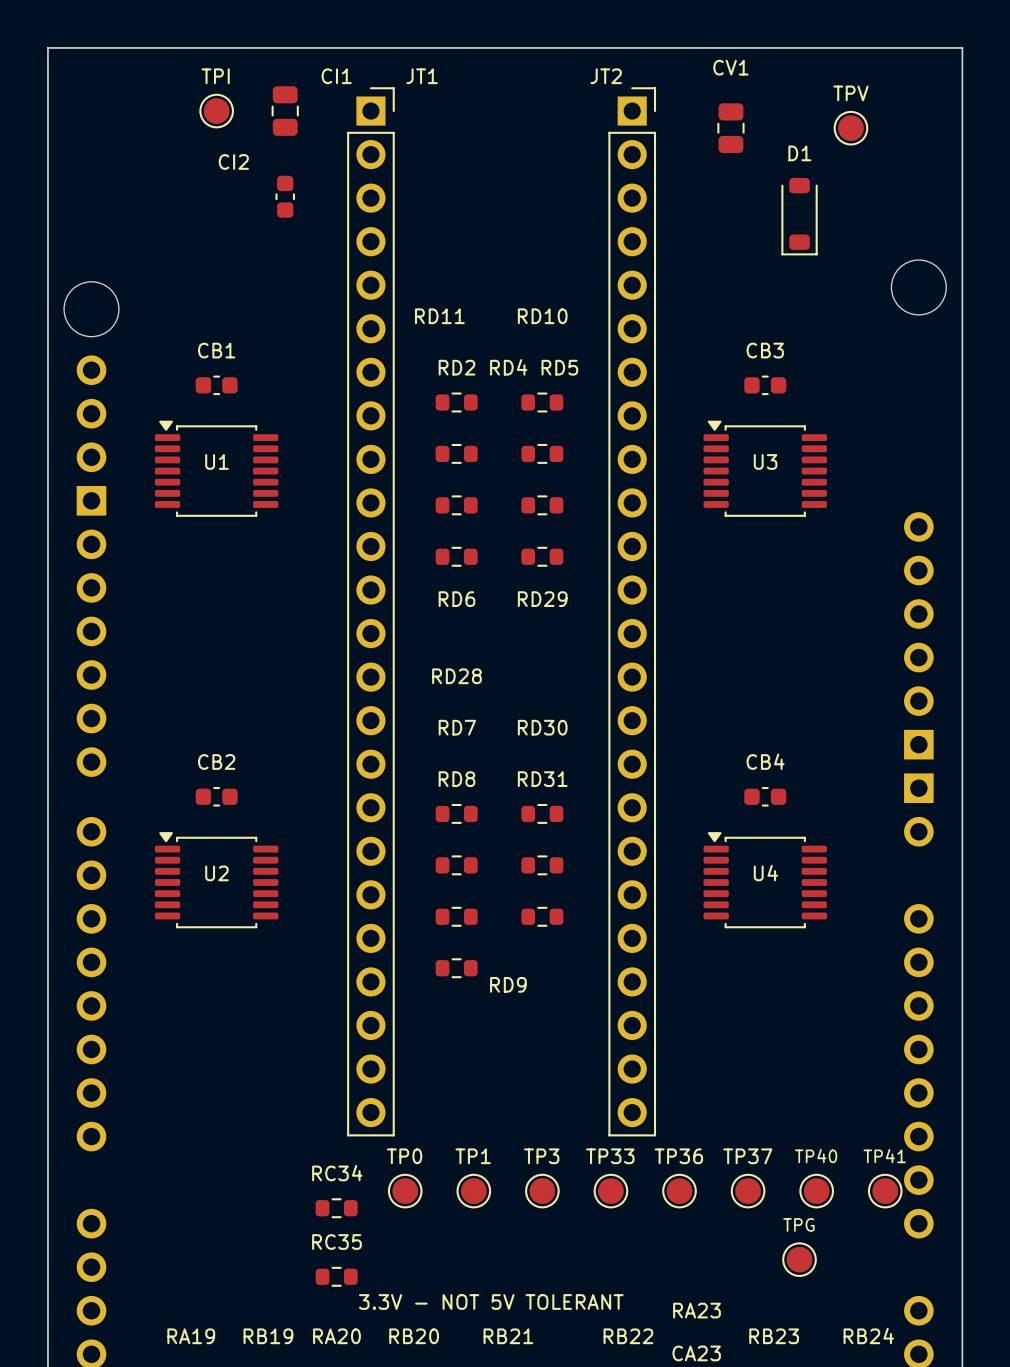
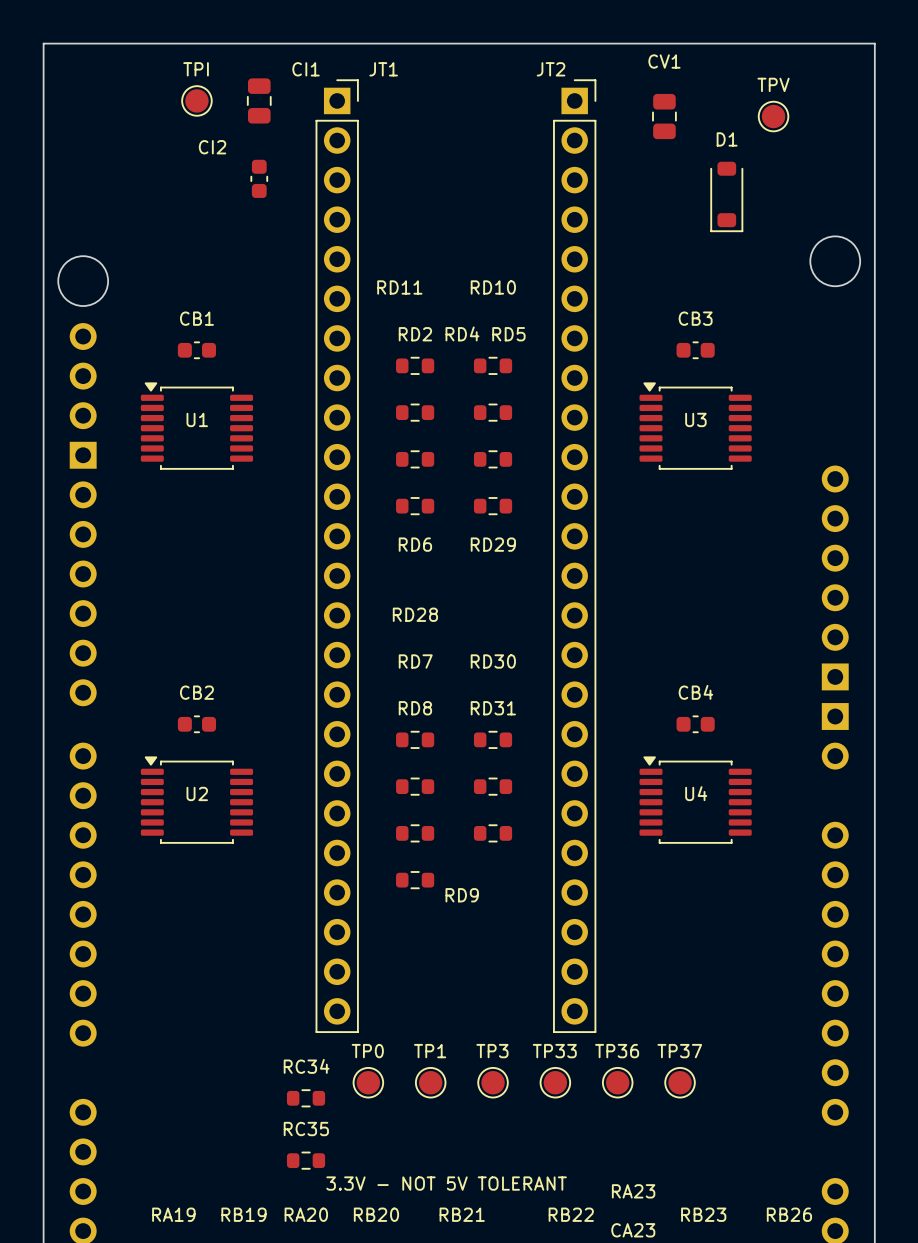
TP40: (816, 1191) -> none
TP41: (885, 1191) -> none
TPG: (799, 1259) -> none
RB24 name: RB24 (868, 1335) -> RB26 (789, 1214)

